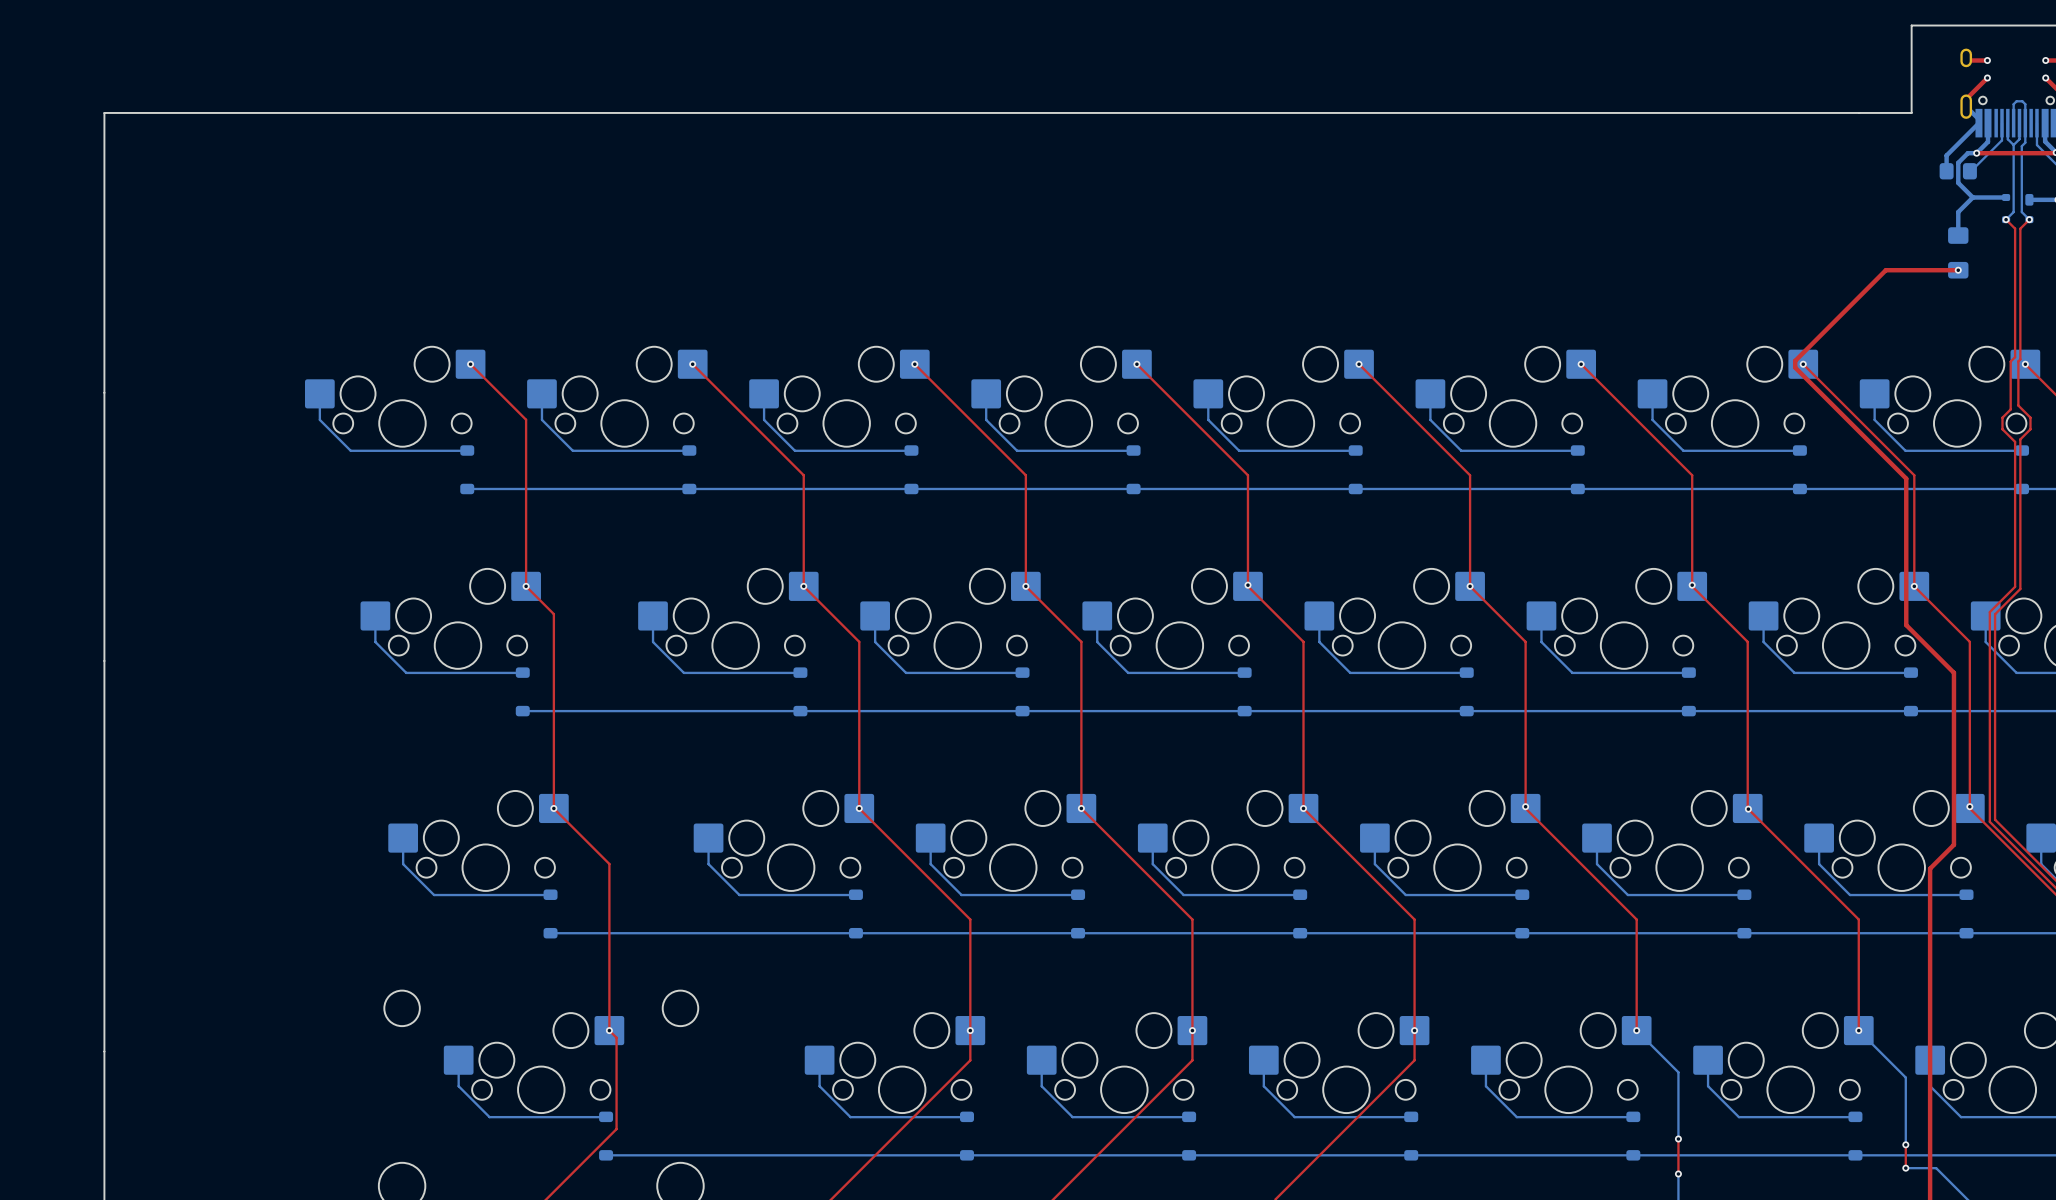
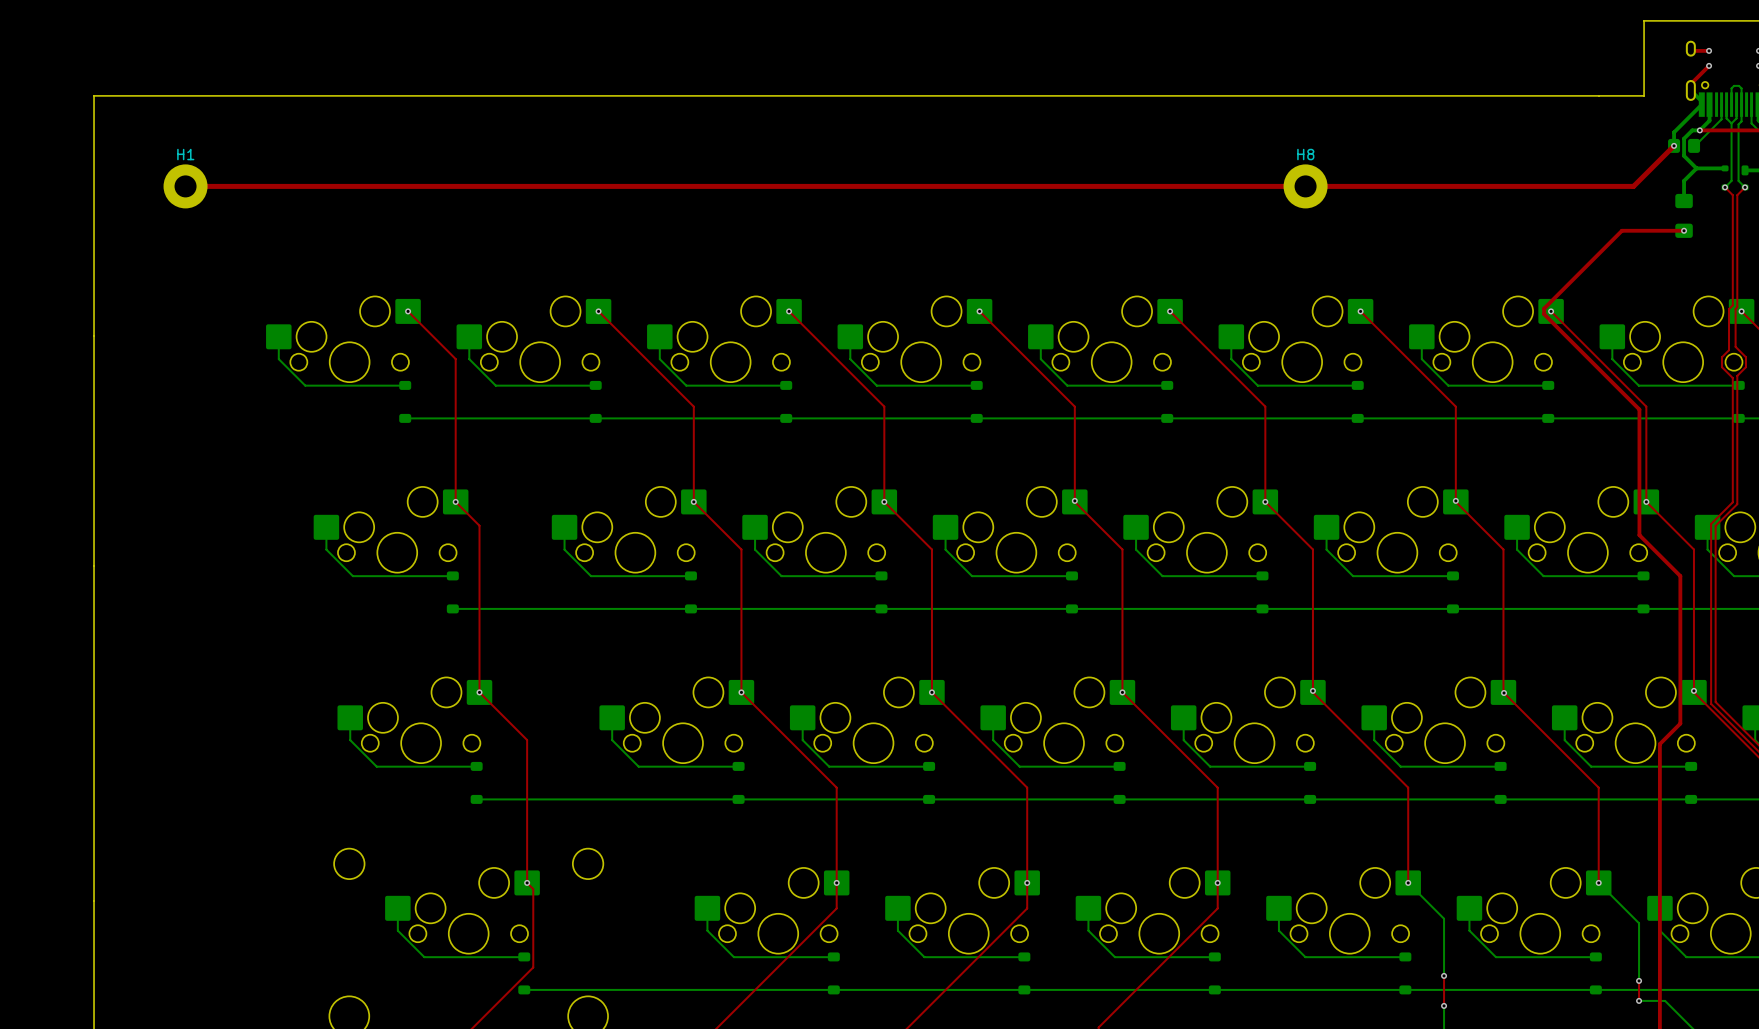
top track: none -> (1674, 145) (1633, 186) (185, 186)
via: none -> (1674, 145)
H1: none -> (185, 186)
H8: none -> (1305, 186)

